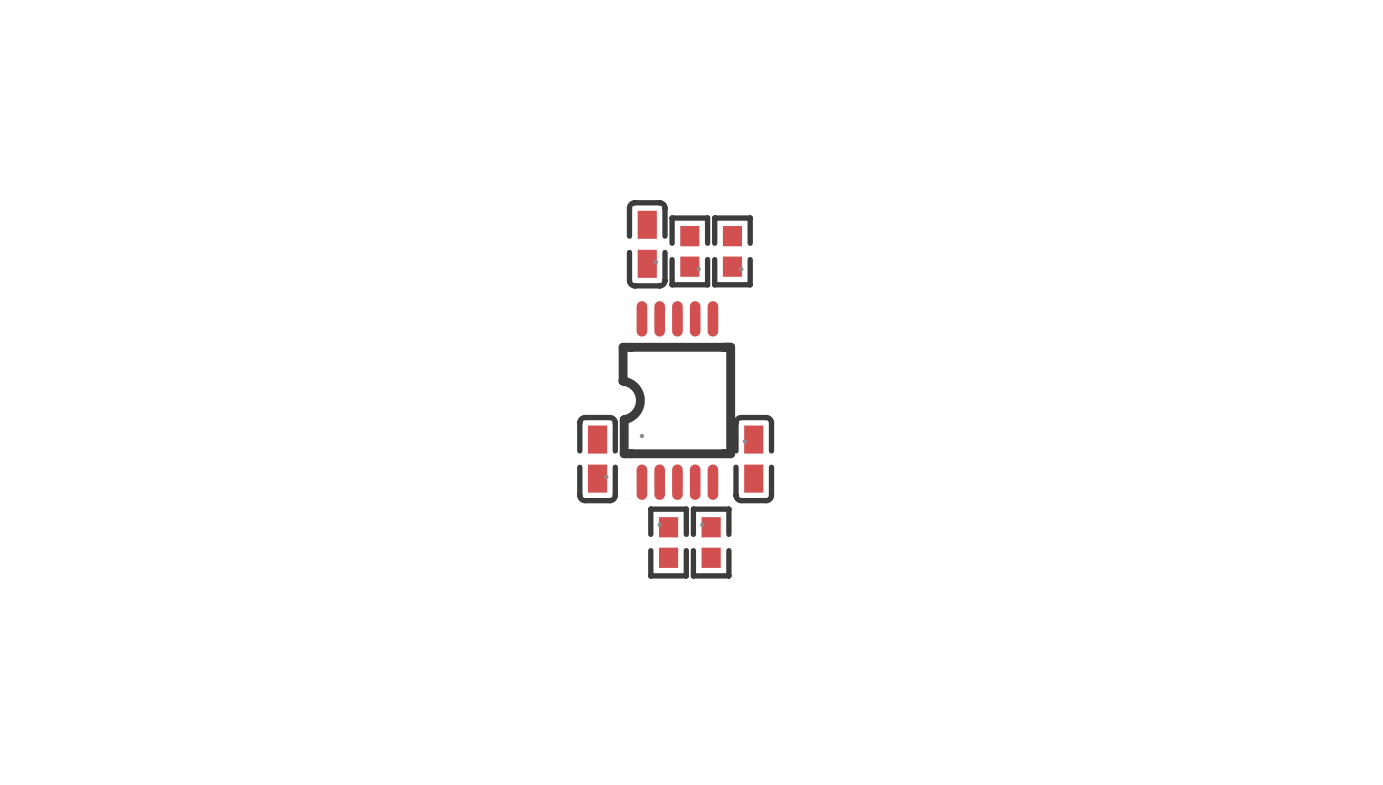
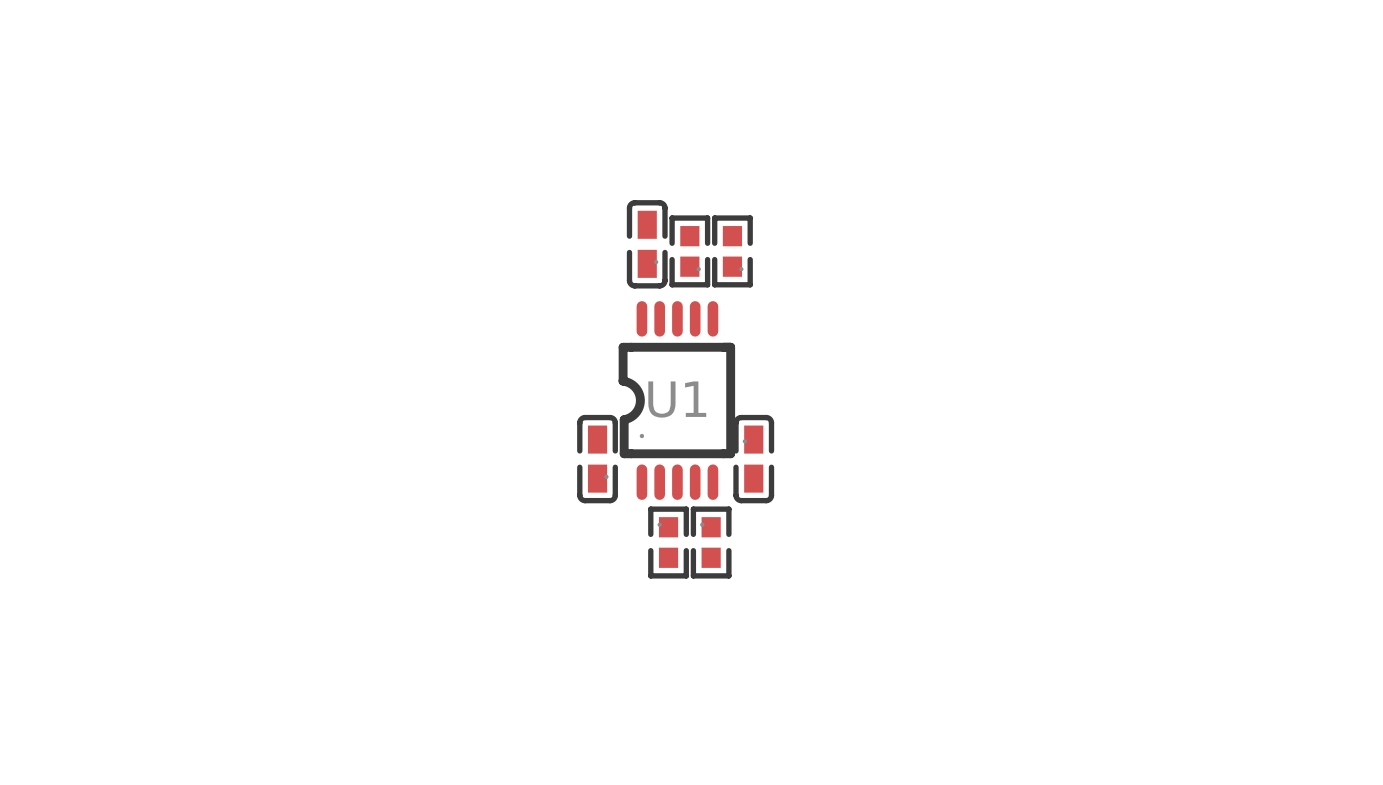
U1 name: none -> U1 (677, 399)

